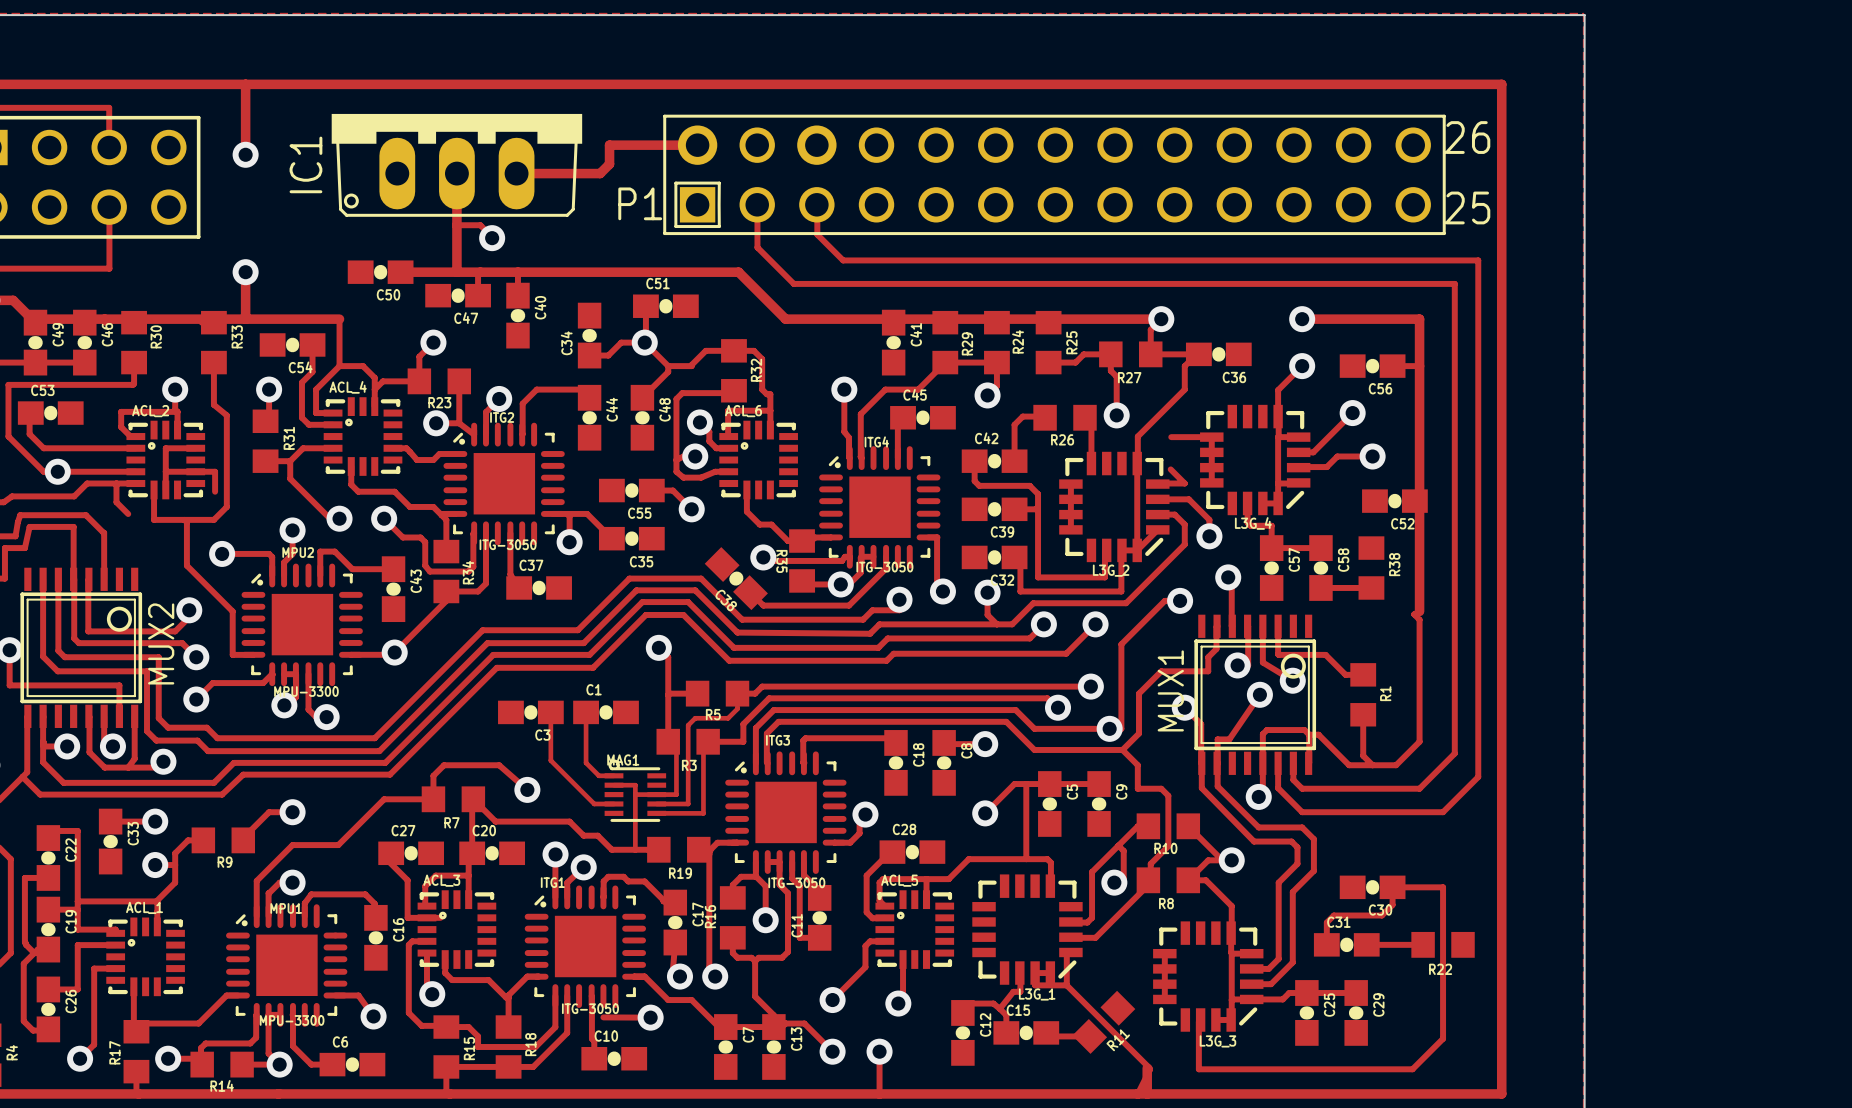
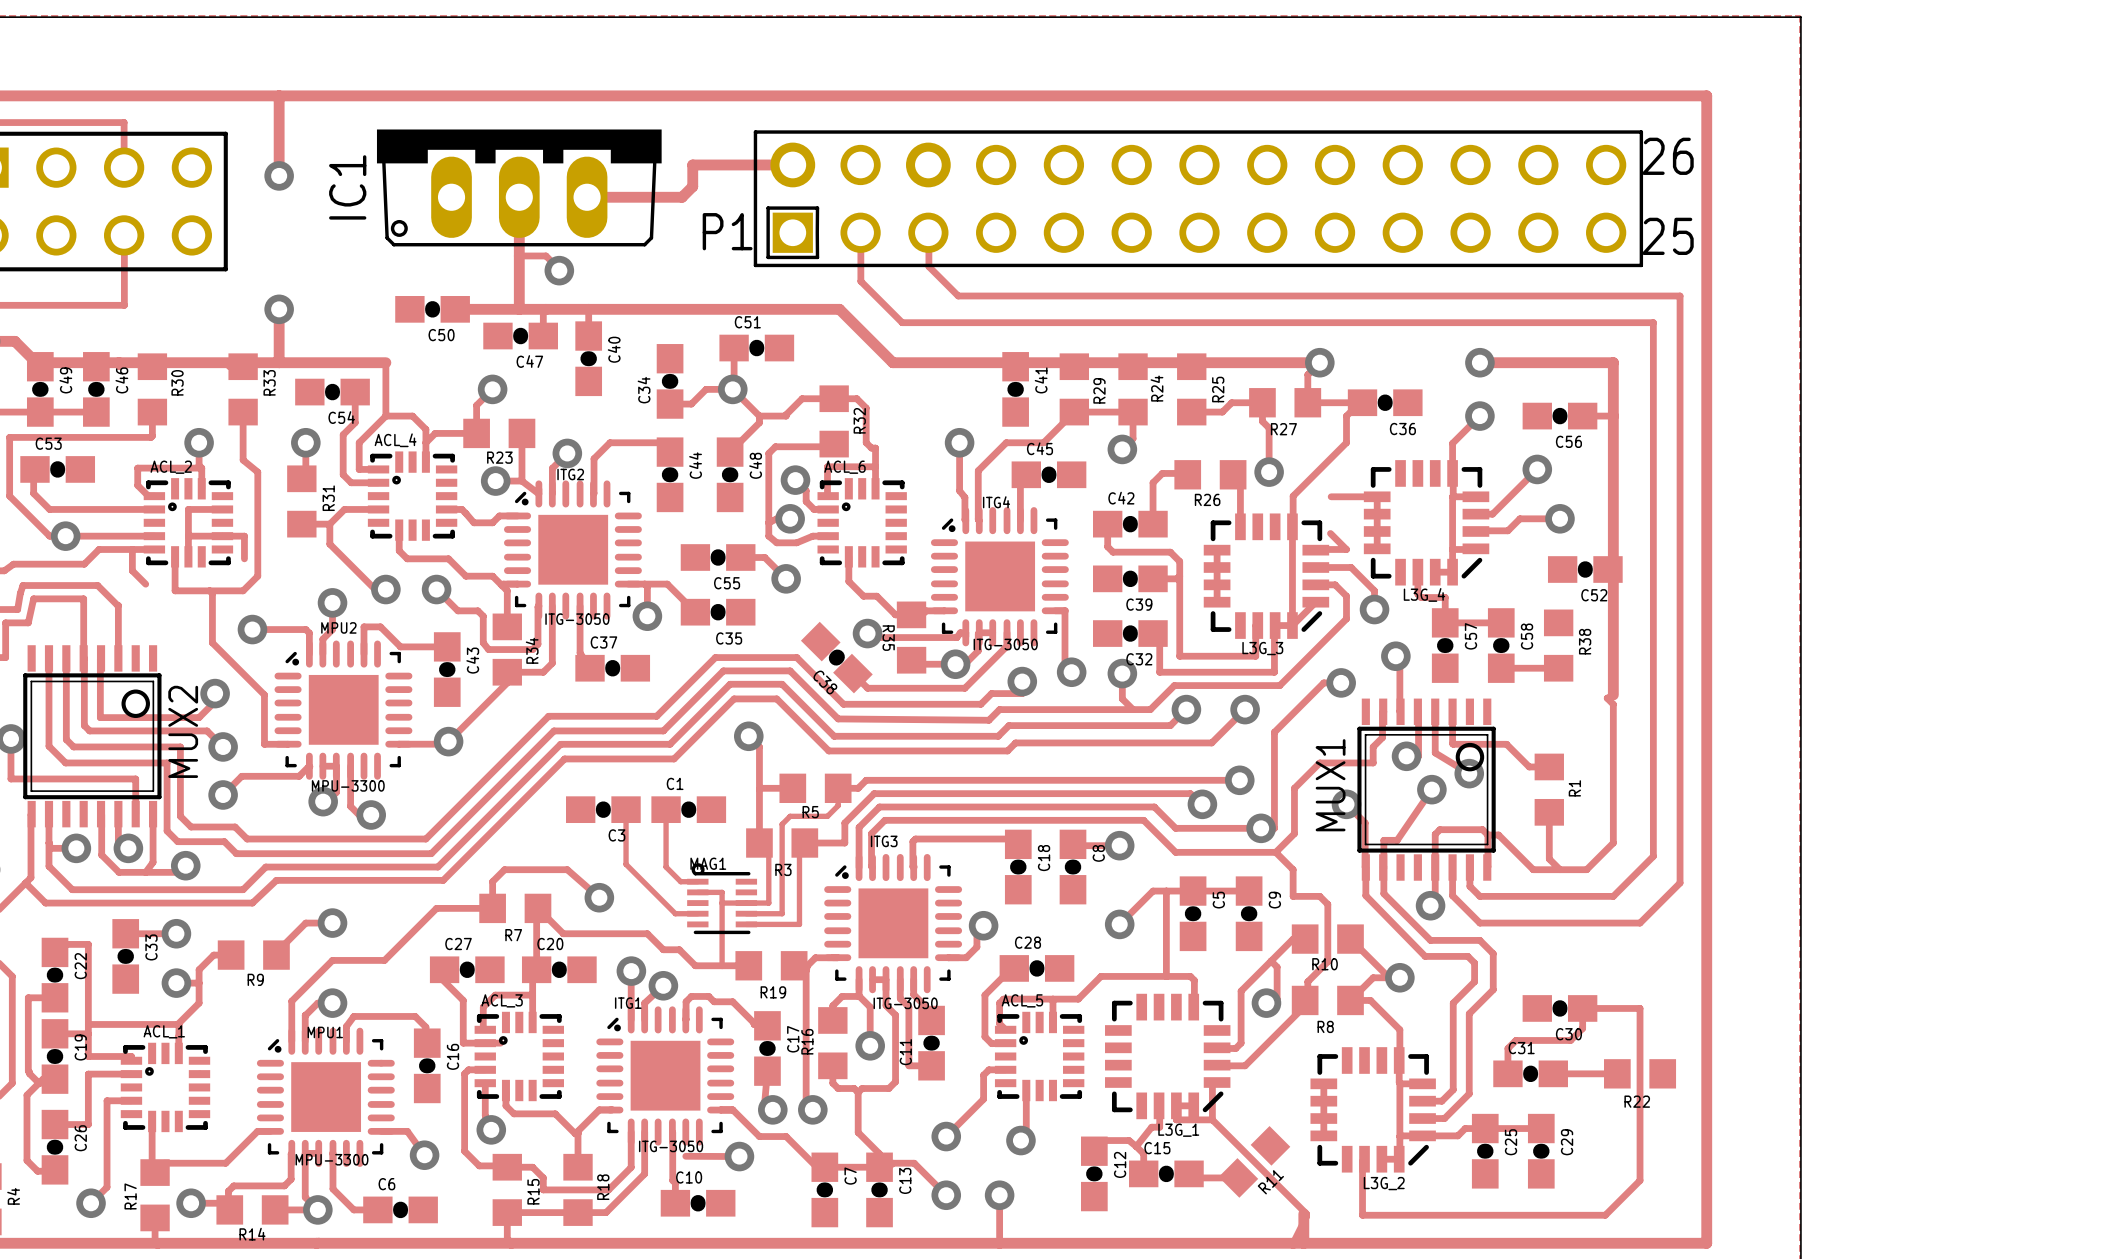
L3G_2 name: L3G_2 (1111, 570) -> L3G_3 (1262, 648)
L3G_3 name: L3G_3 (1217, 1041) -> L3G_2 (1384, 1183)

